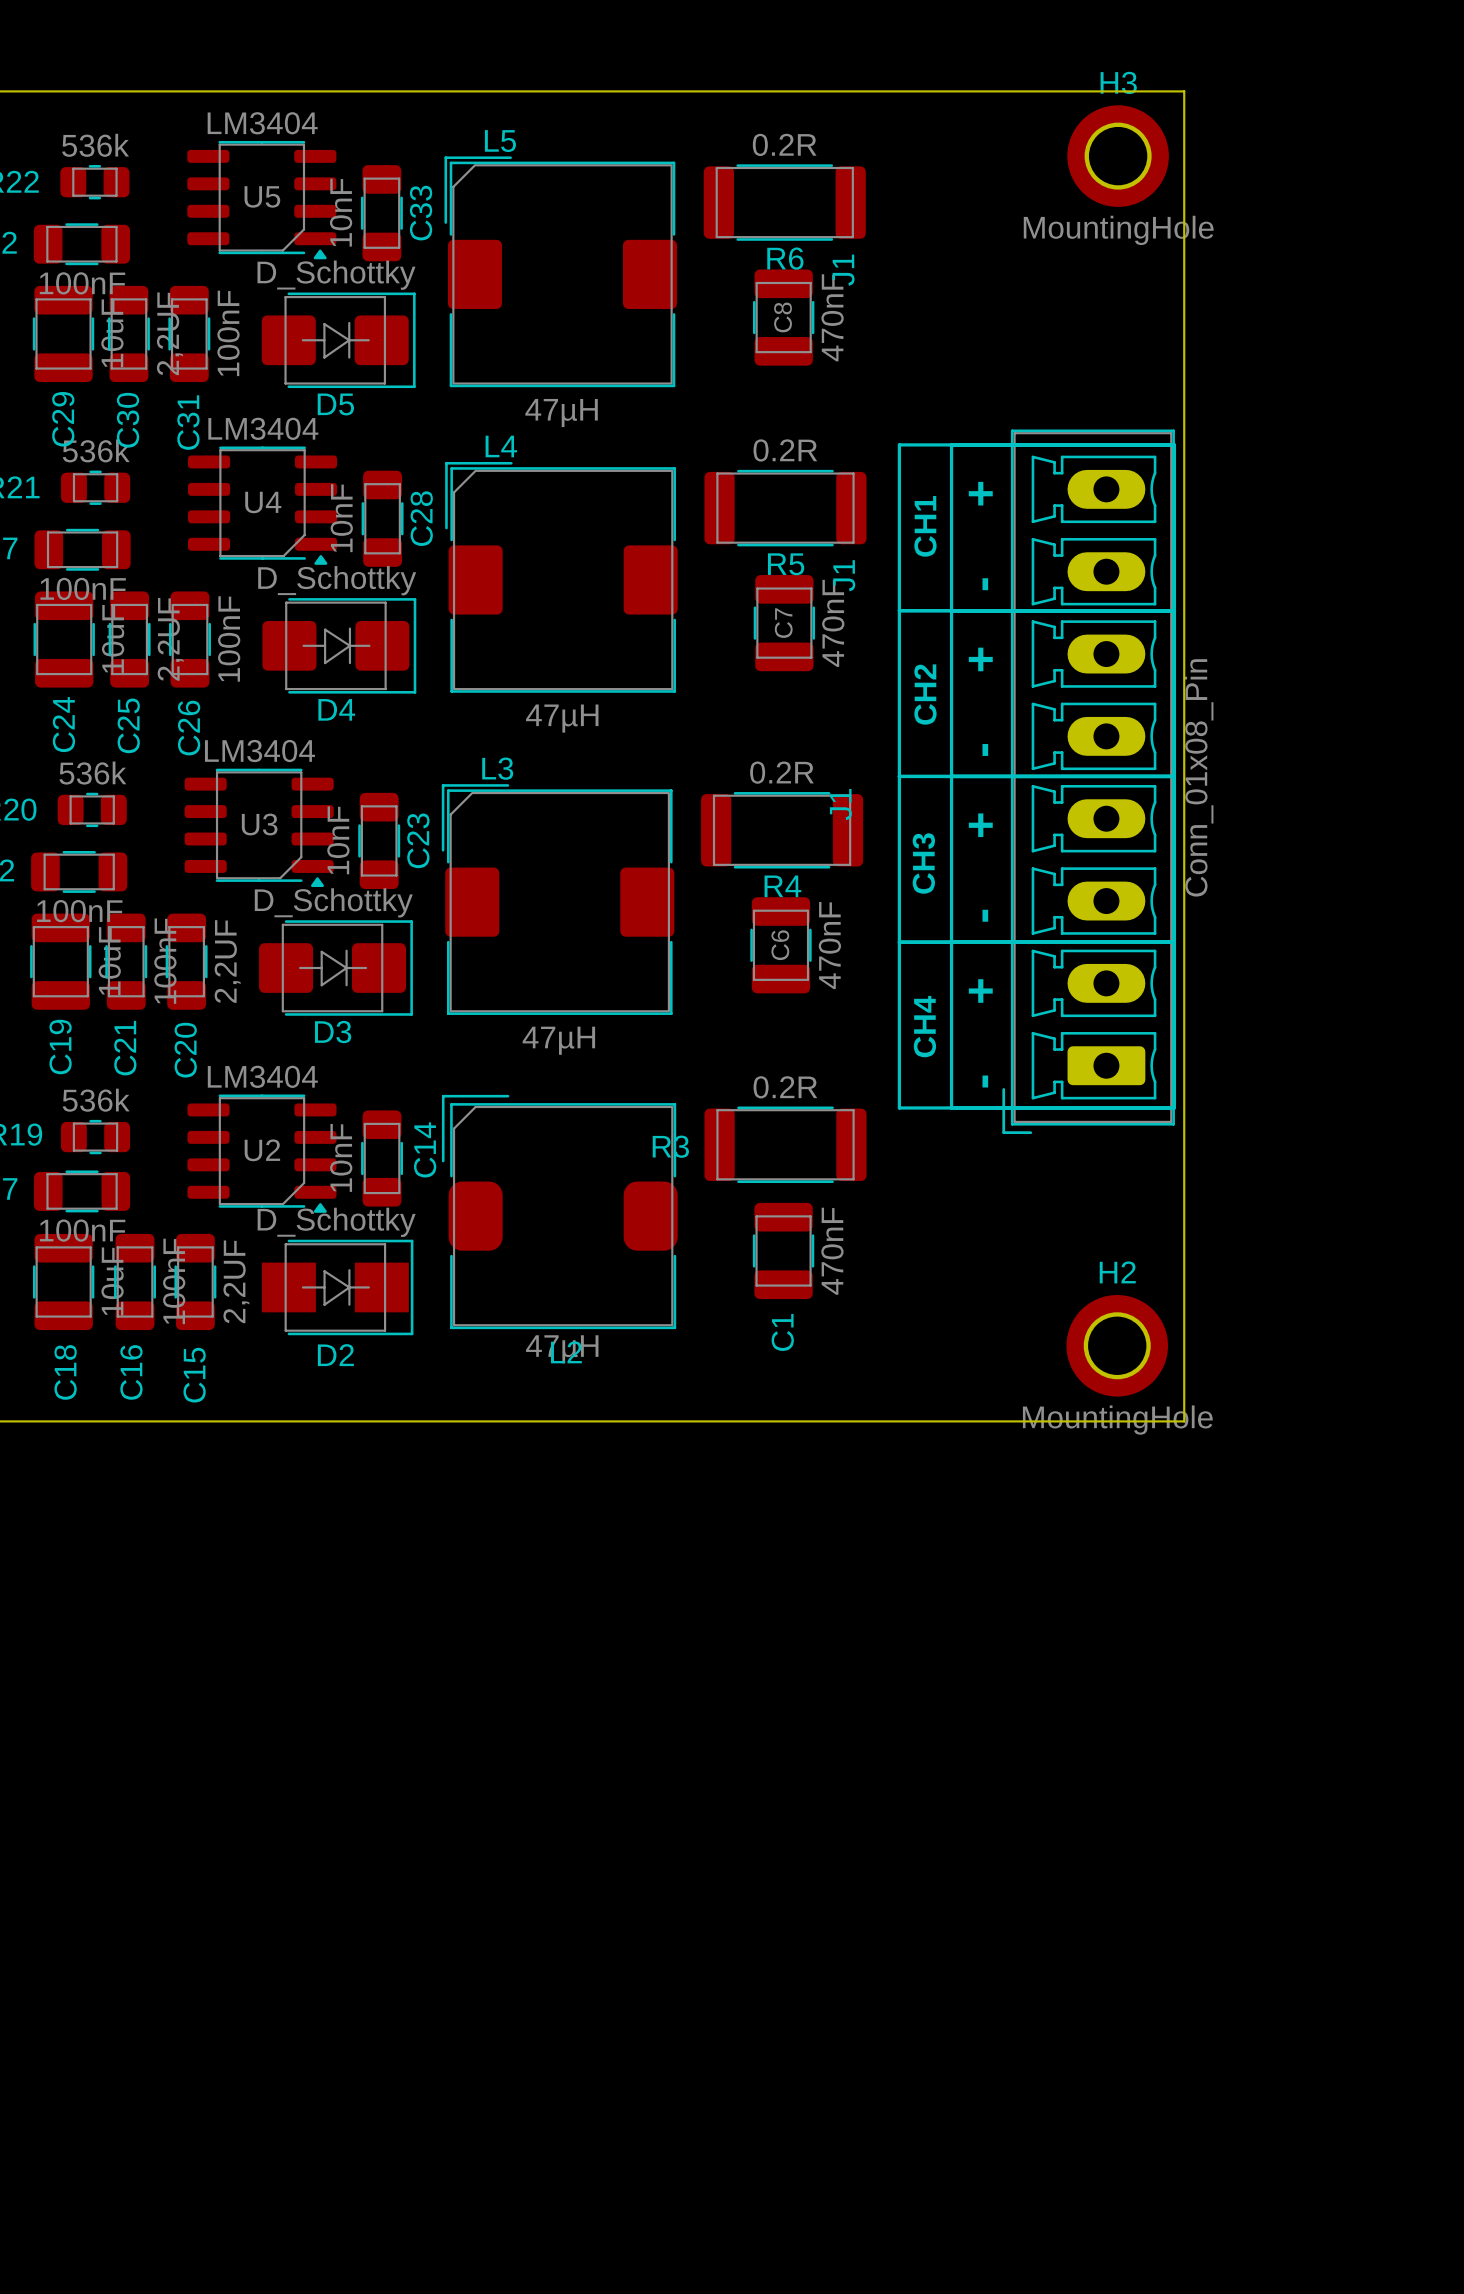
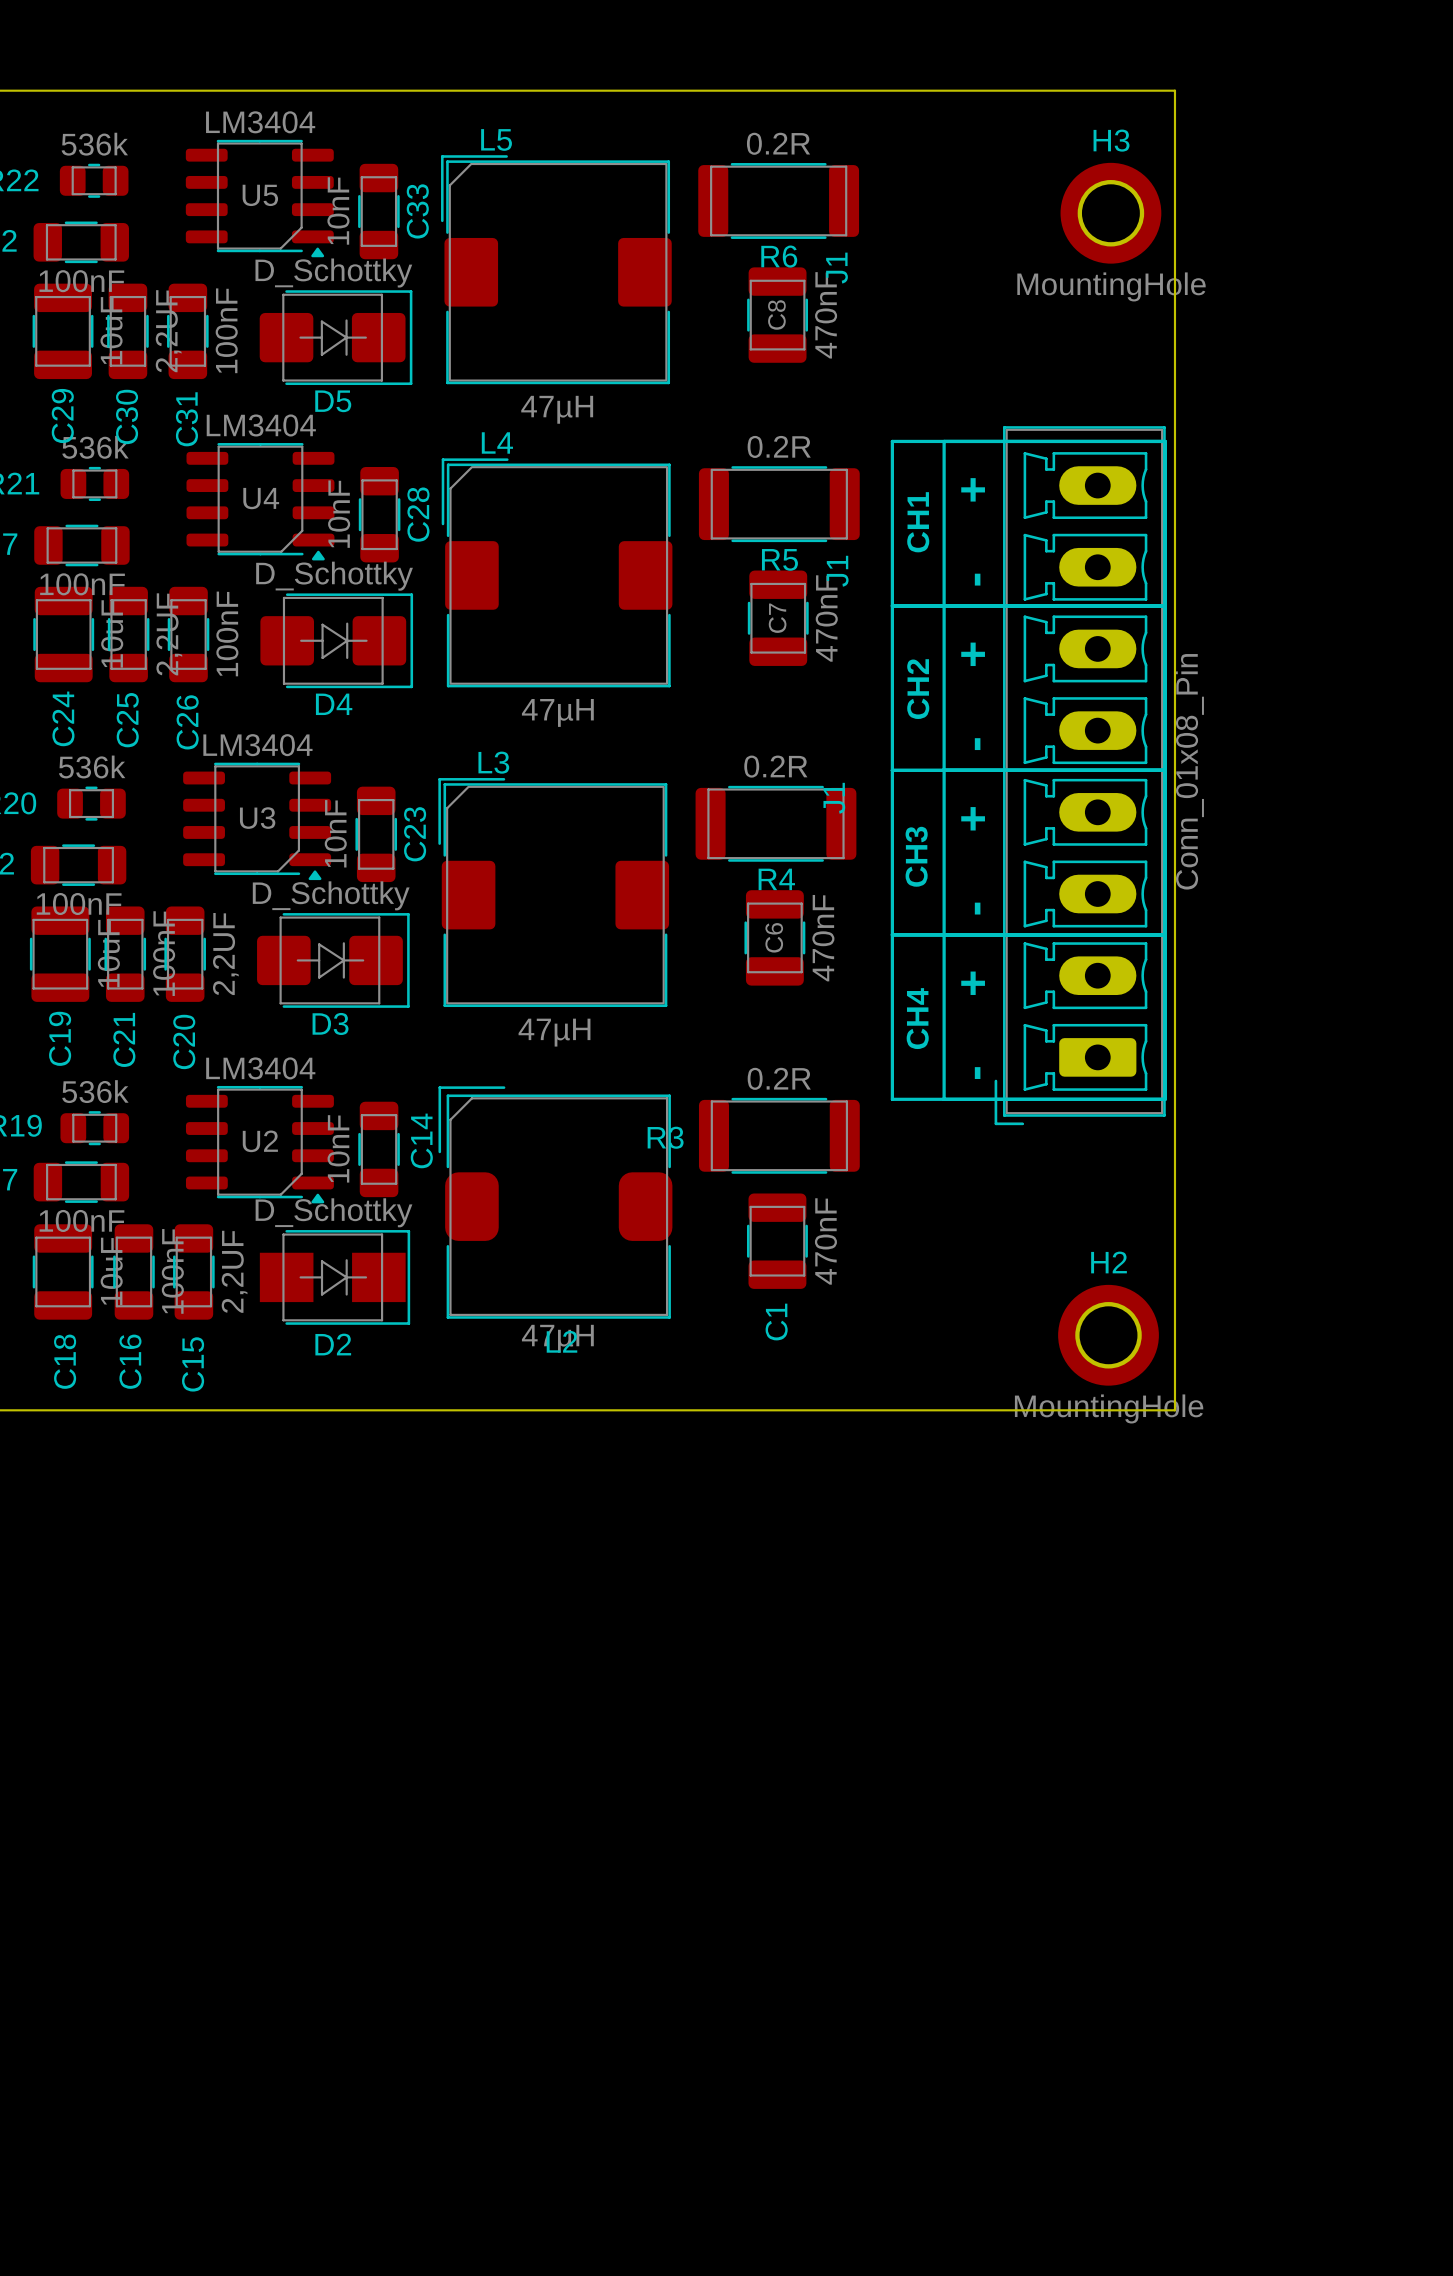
H3 position: (1118, 156) -> (1110, 213)

